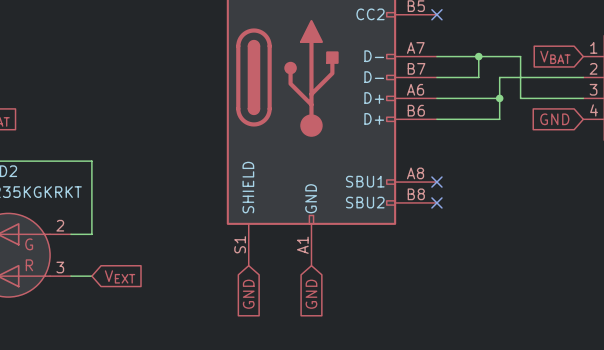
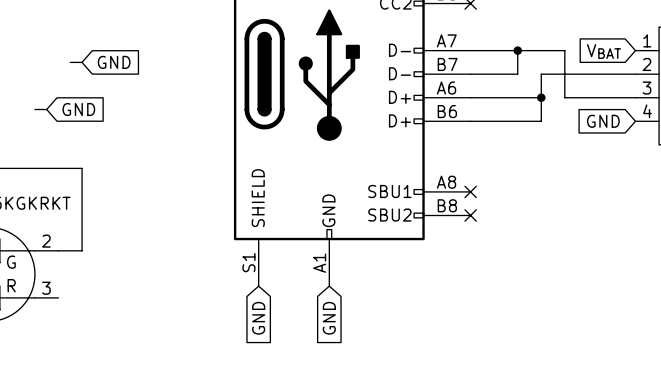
wire: none -> (70, 62) (82, 62)
global label: none -> GND (114, 62)
wire: none -> (34, 109) (46, 109)
global label: none -> GND (78, 109)
wire: (70, 276) (91, 276) -> none
global label: VEXT (120, 276) -> none

